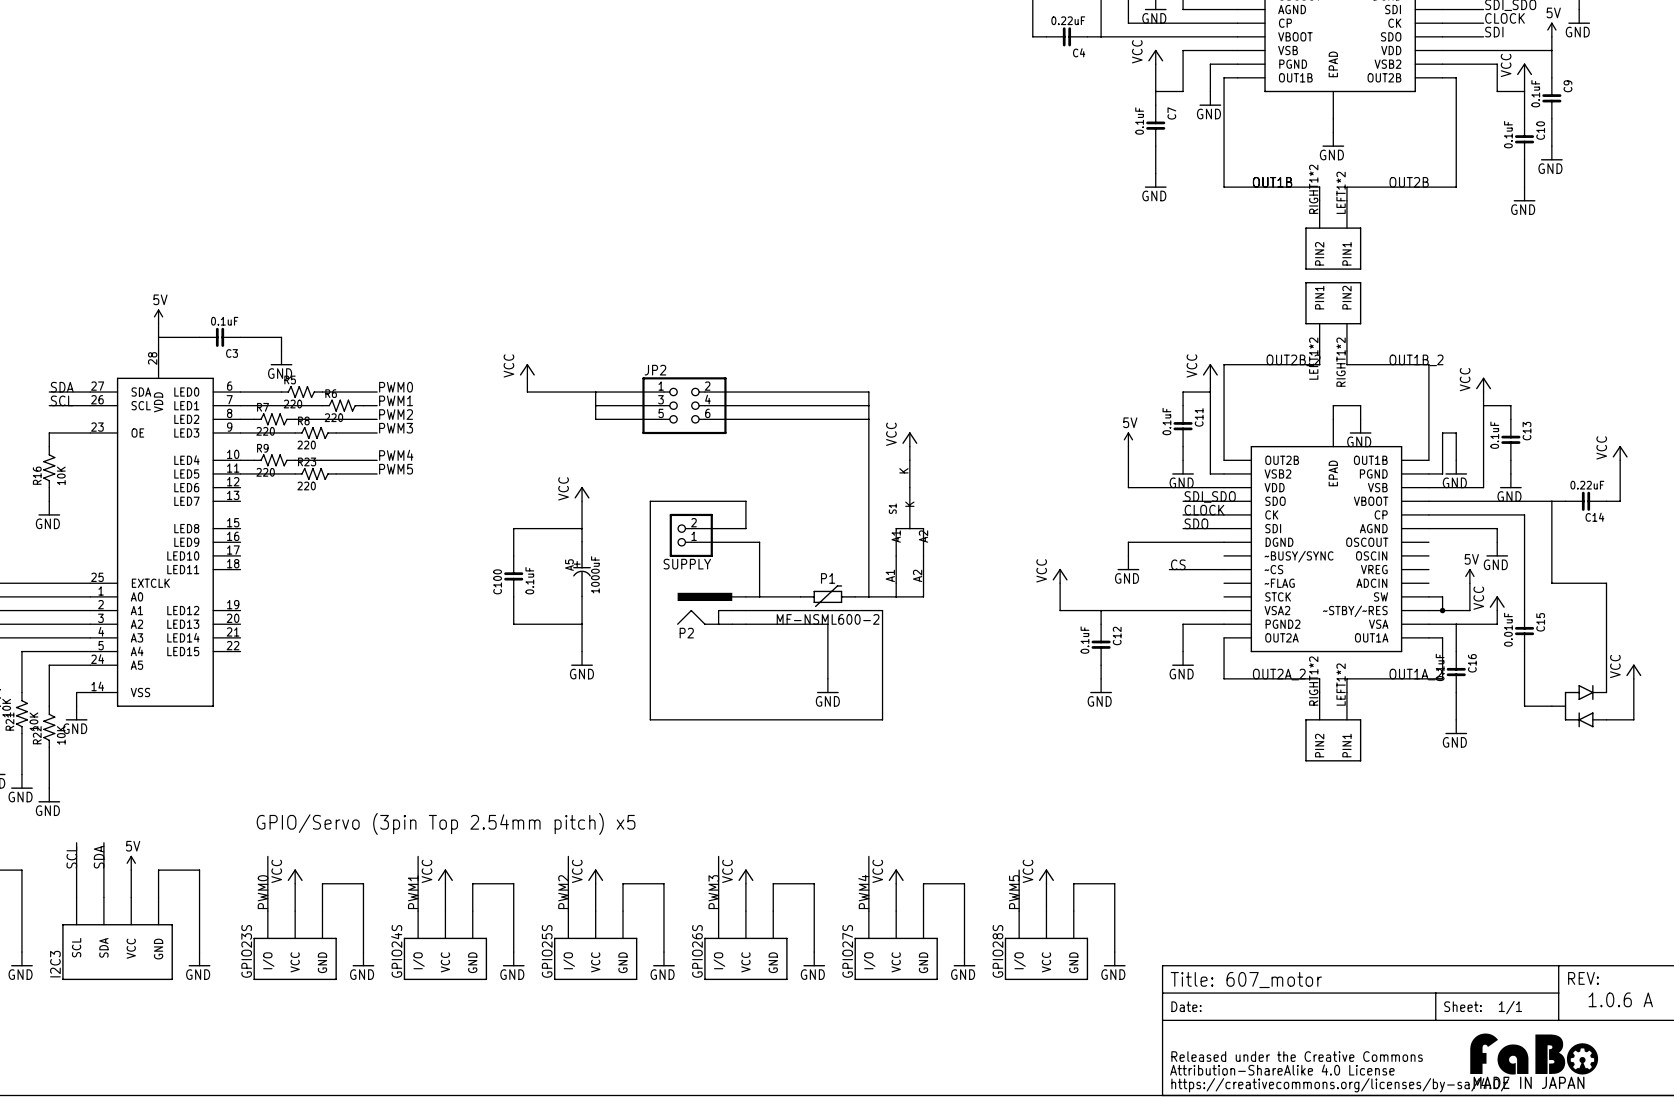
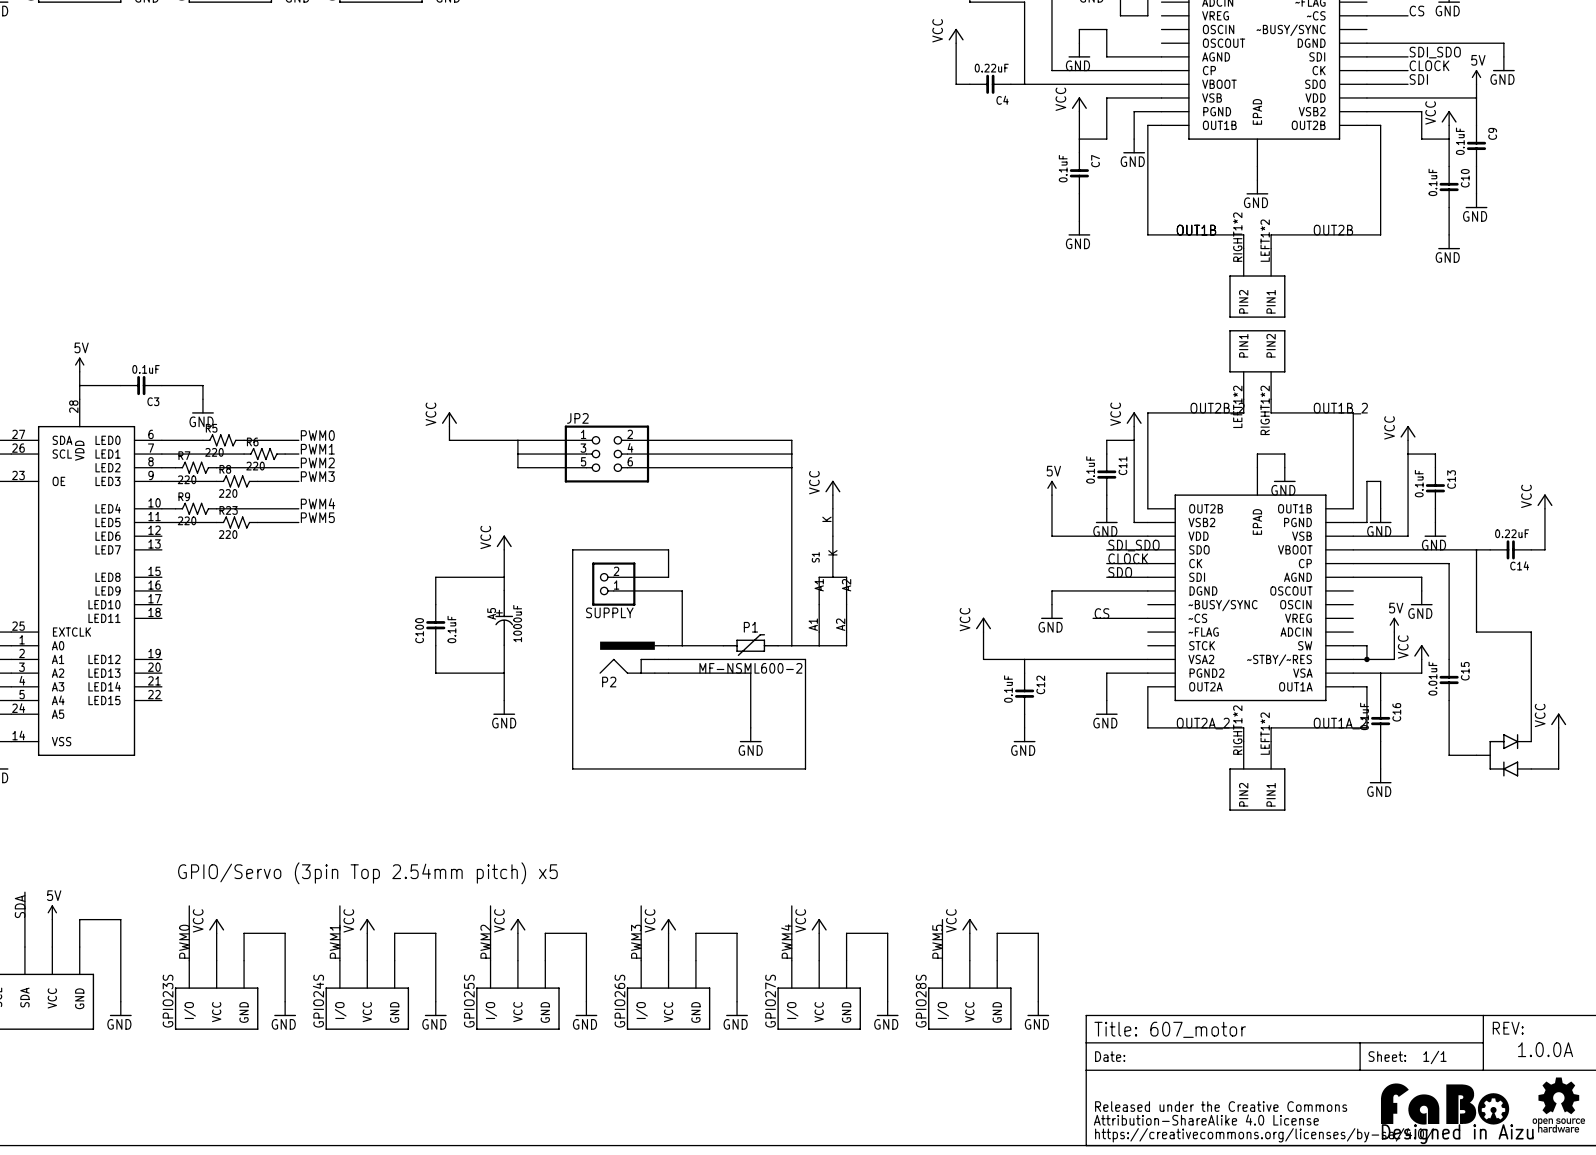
text: 1.0.6 A (1620, 999) -> 1.0.0A (1545, 1049)
part: none -> (1445, 1104)
part: (1534, 1054) -> none
part: none -> (1558, 1105)

